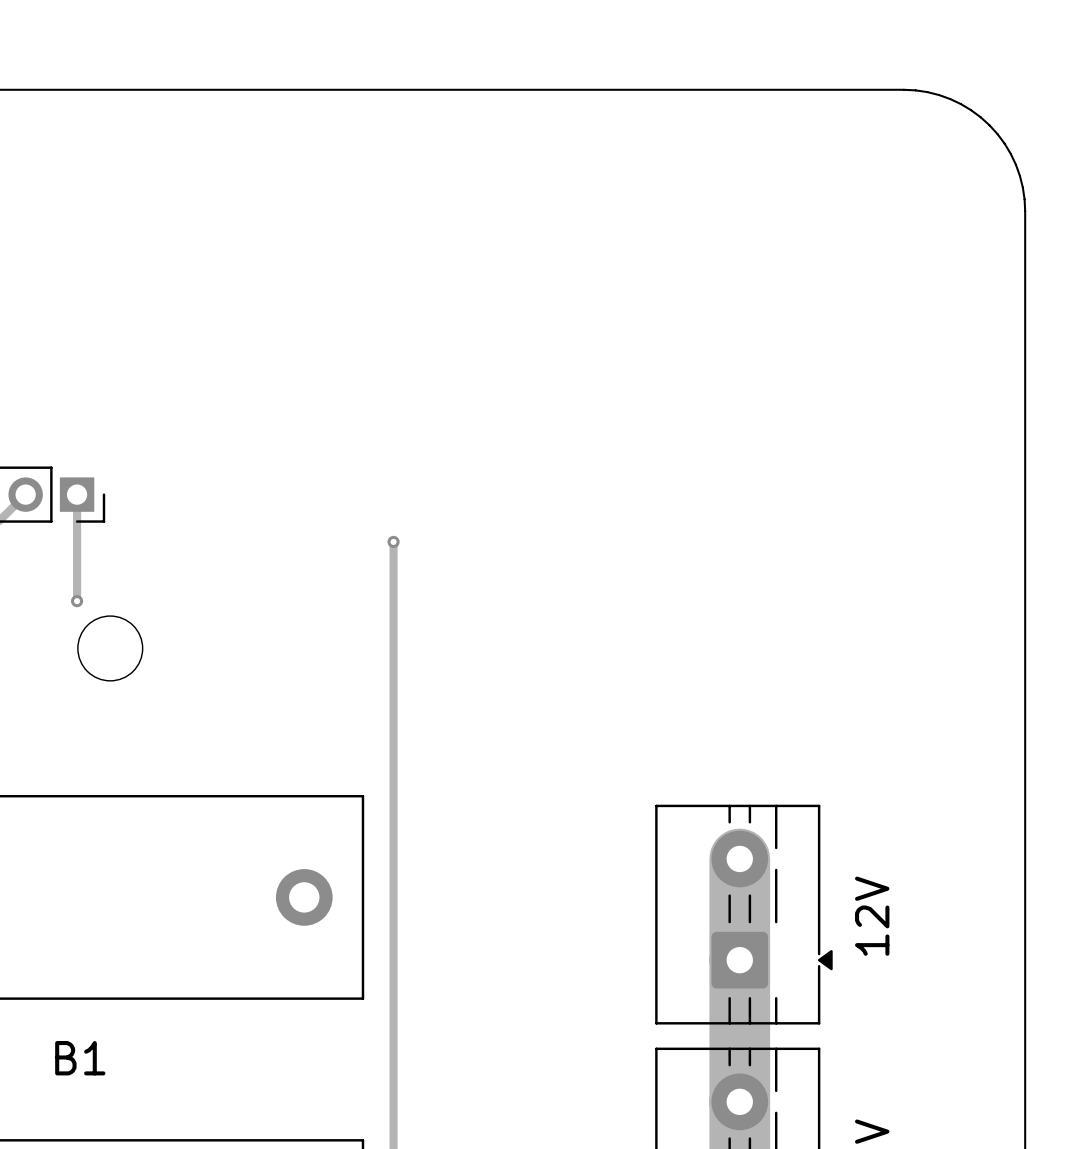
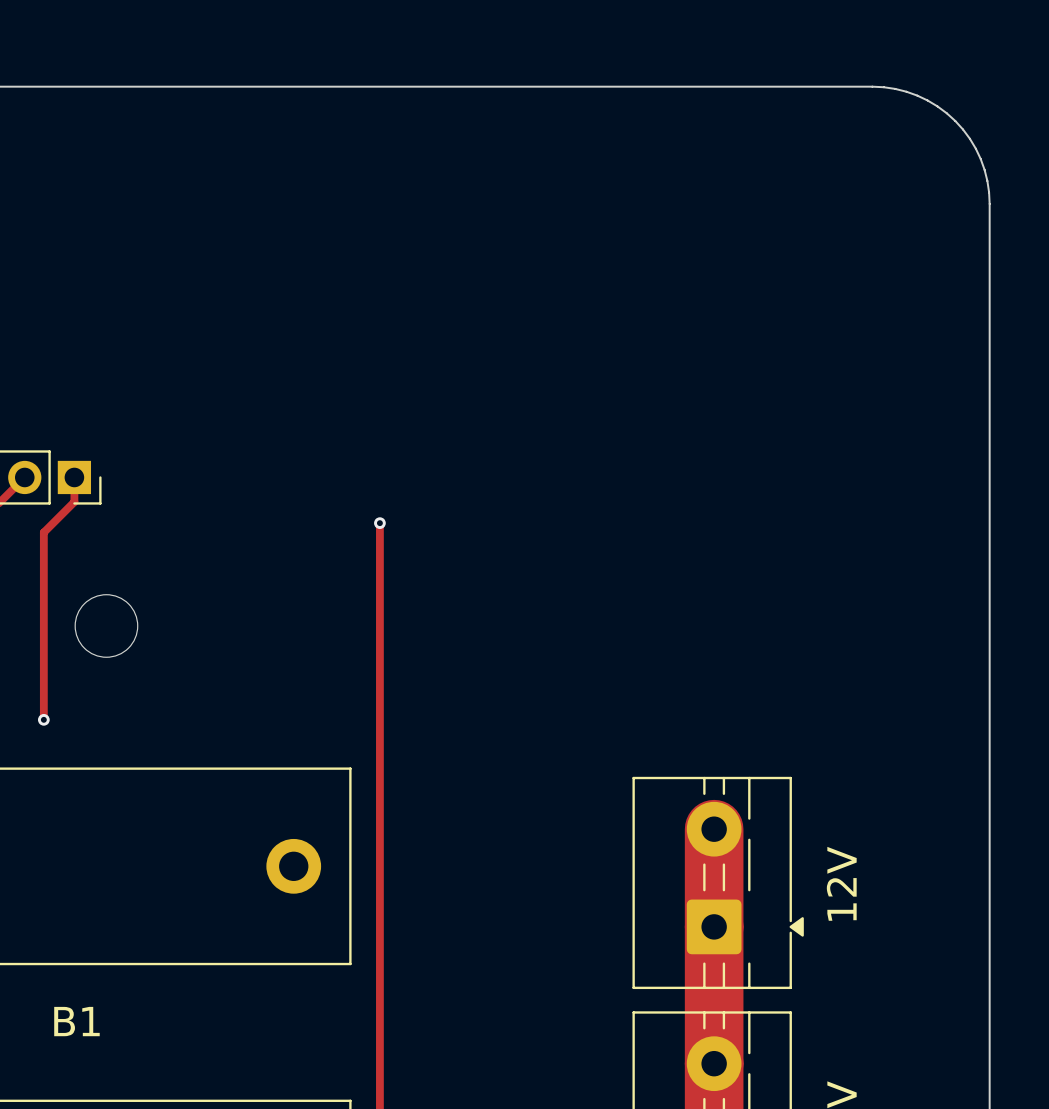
track: (77, 519) (77, 601) -> (74, 501) (43, 532) (43, 719)
via: (77, 601) -> none
via: none -> (43, 719)

